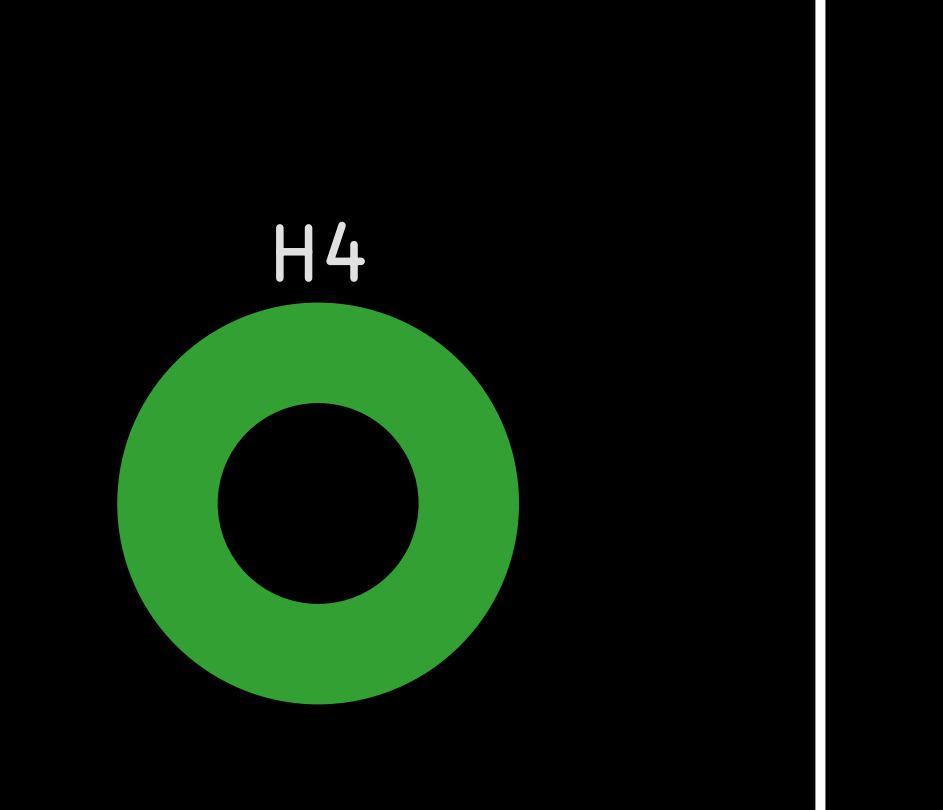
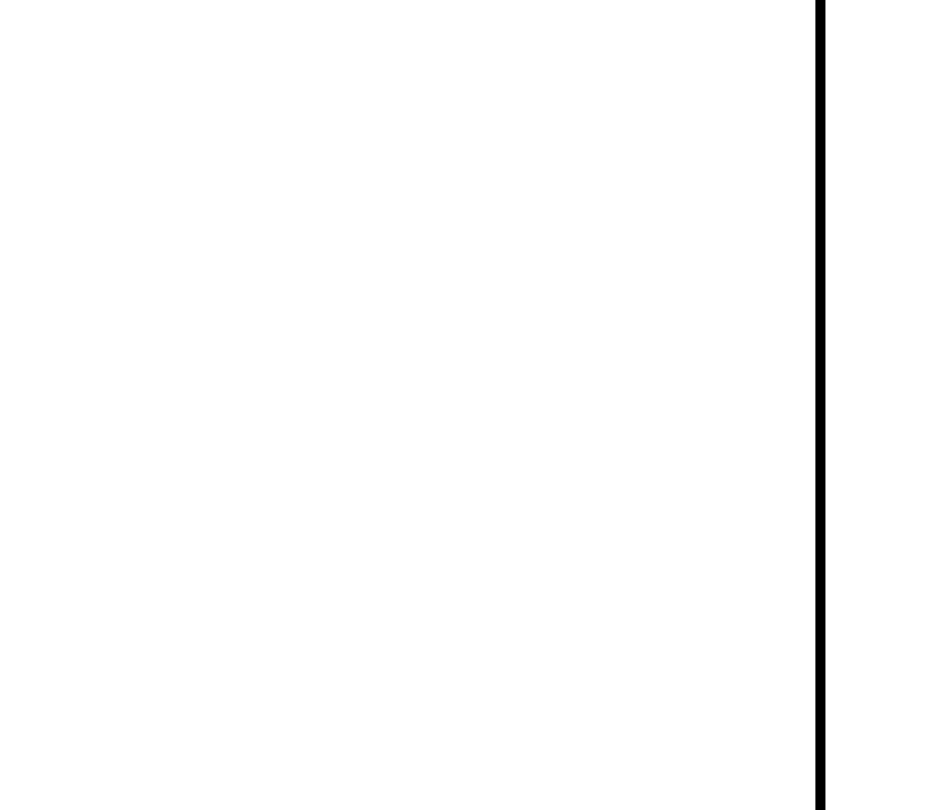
H4: (318, 503) -> none

